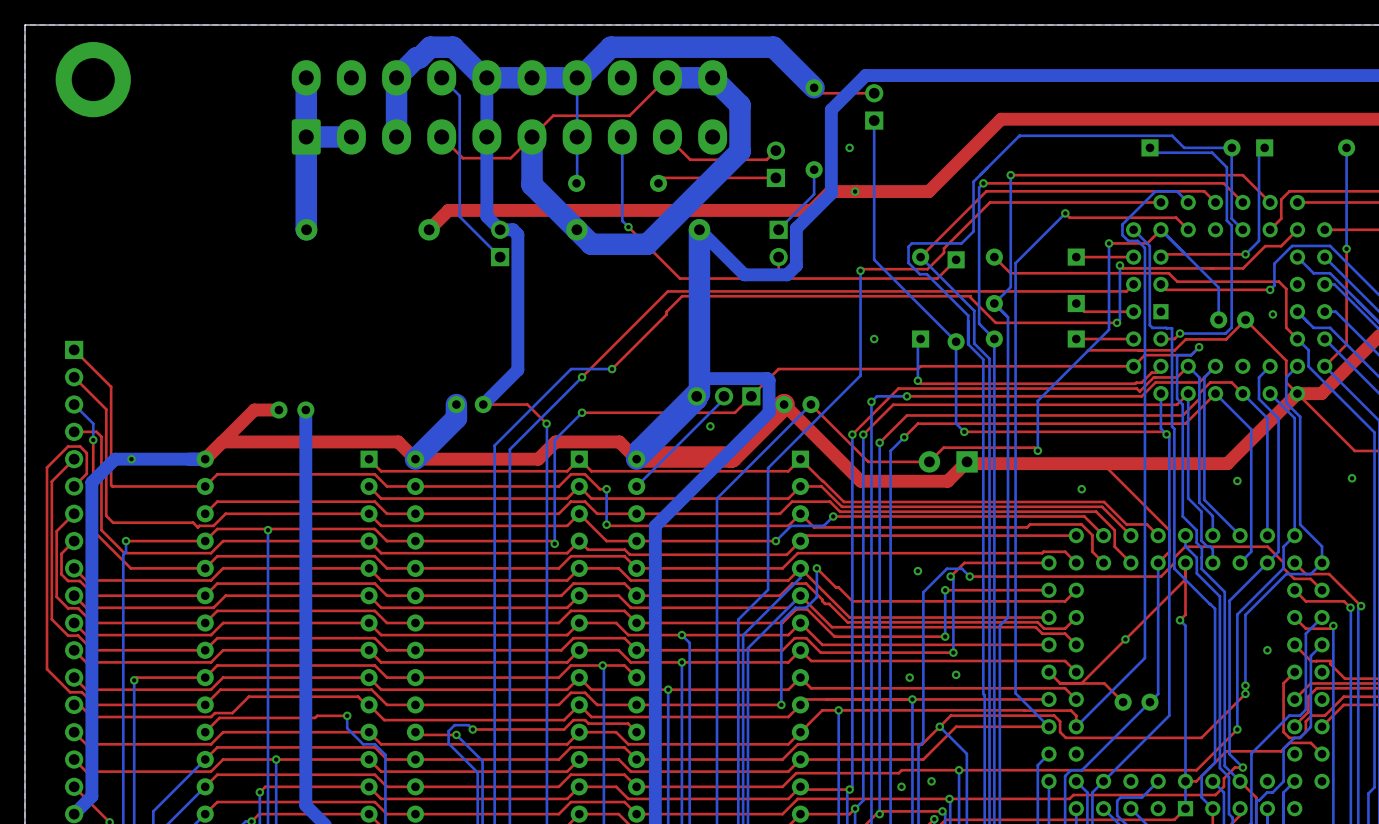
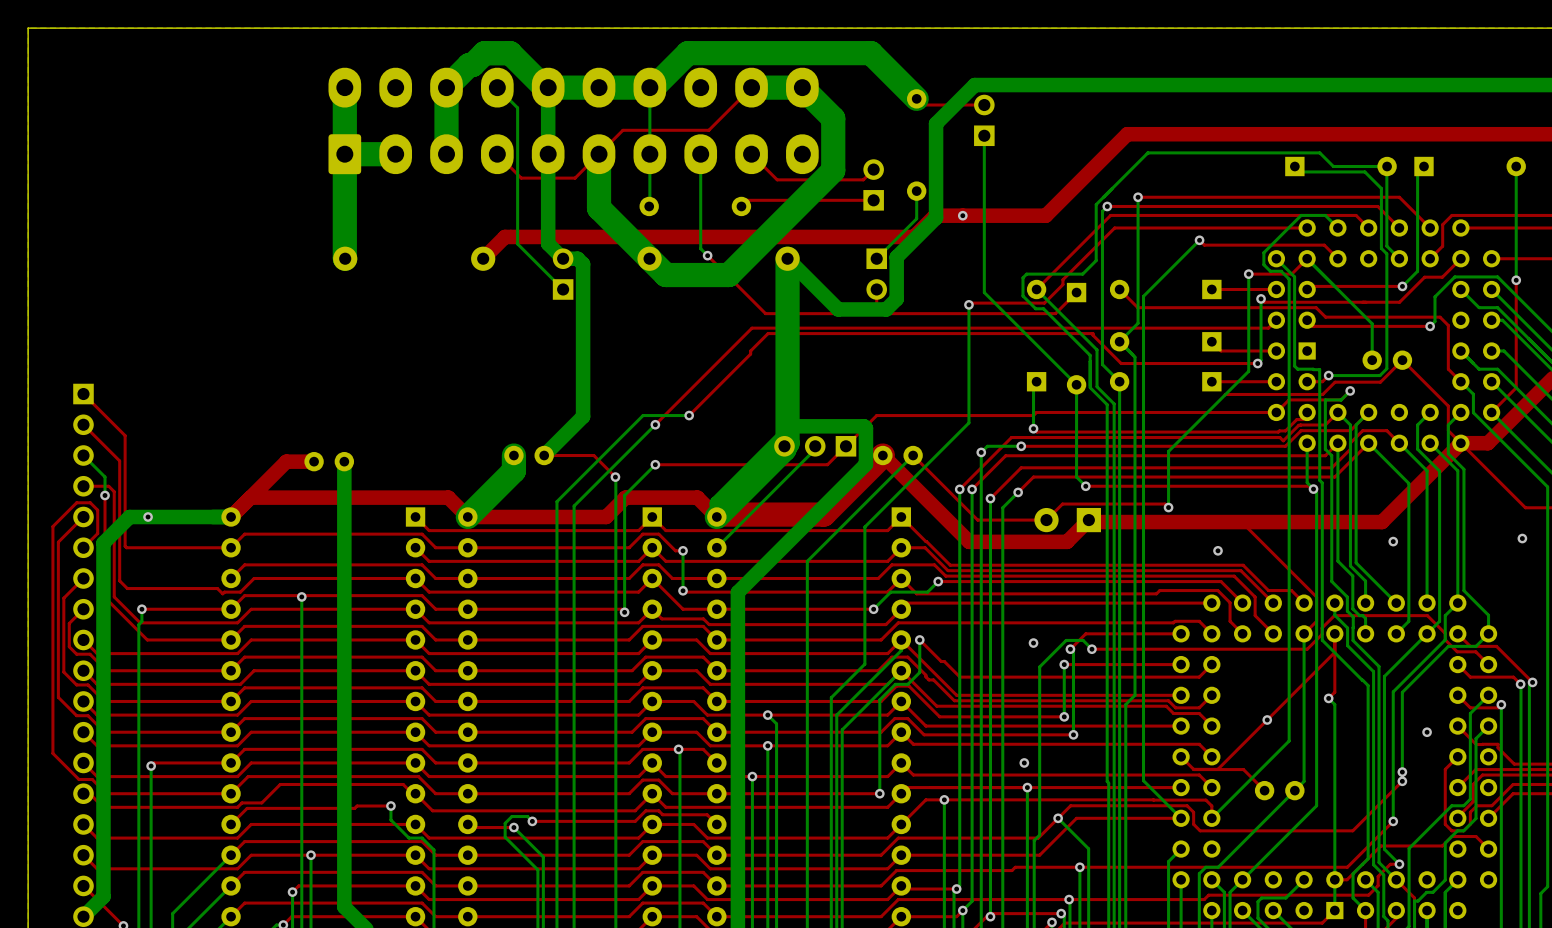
via: (93, 79) -> none
via: (849, 147) -> none
via: (1272, 314) -> none
via: (874, 339) -> none
via: (710, 426) -> none
via: (956, 674) -> none
via: (931, 781) -> none
via: (901, 786) -> none

